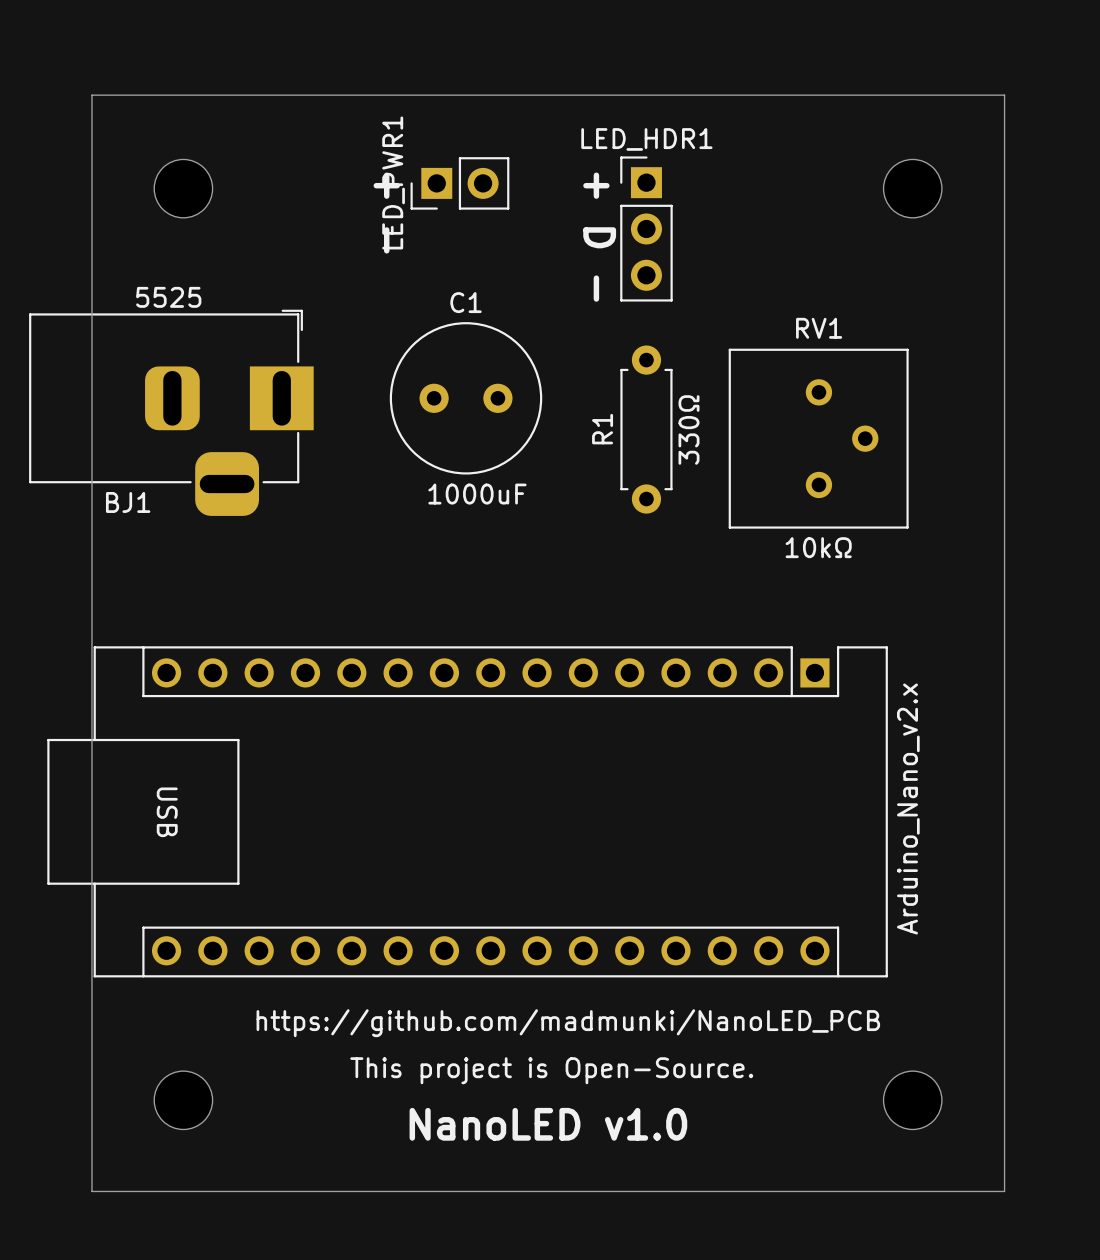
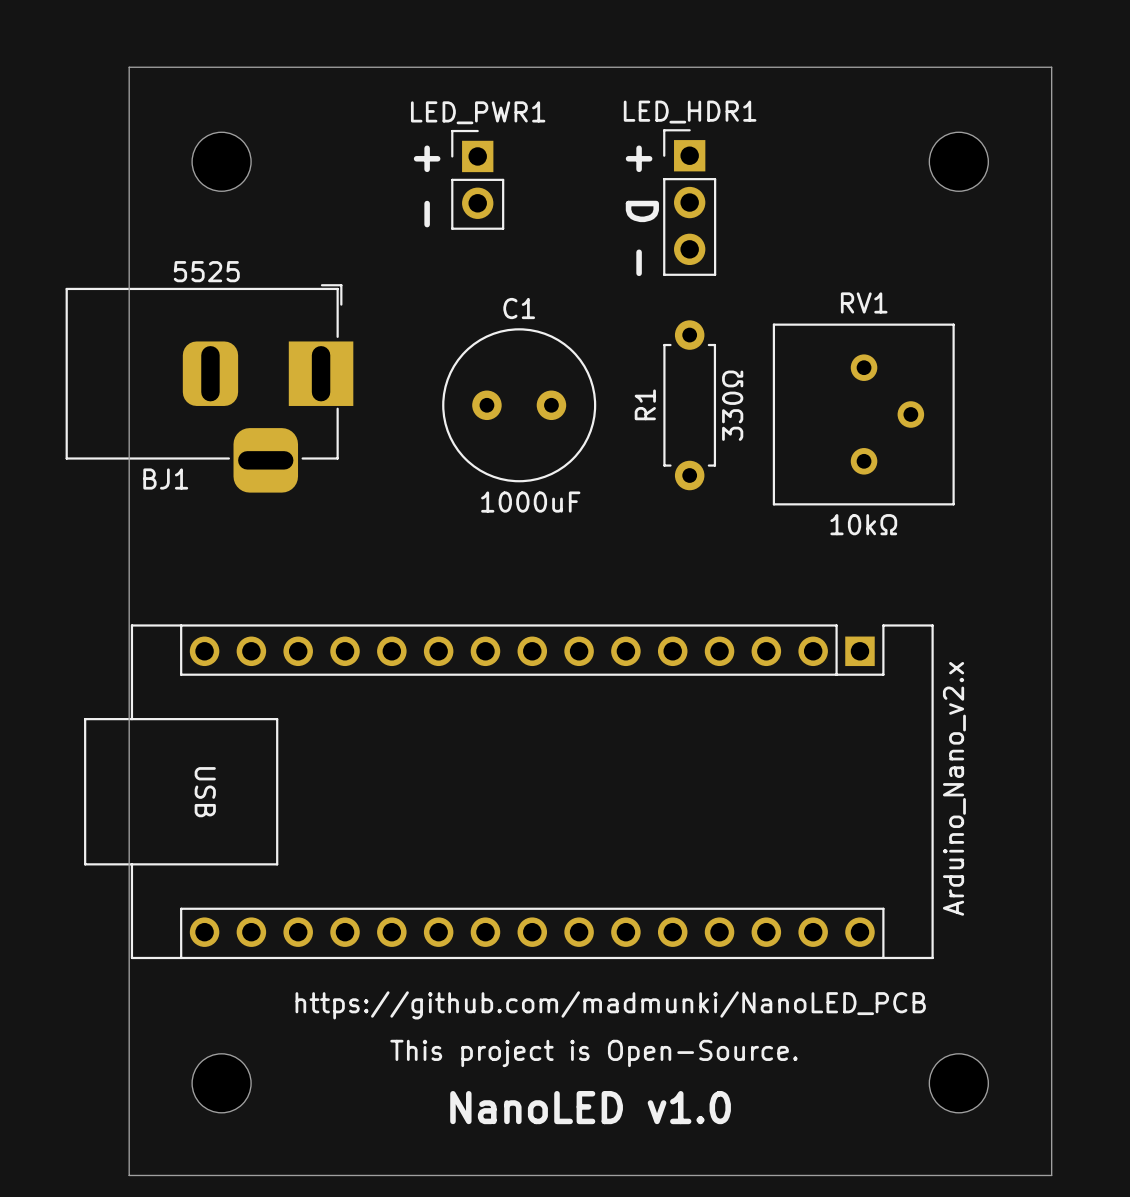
LED_PWR1 rotation: 0° (459, 183) -> 90° clockwise (477, 179)
C1 position: (466, 398) -> (519, 405)

